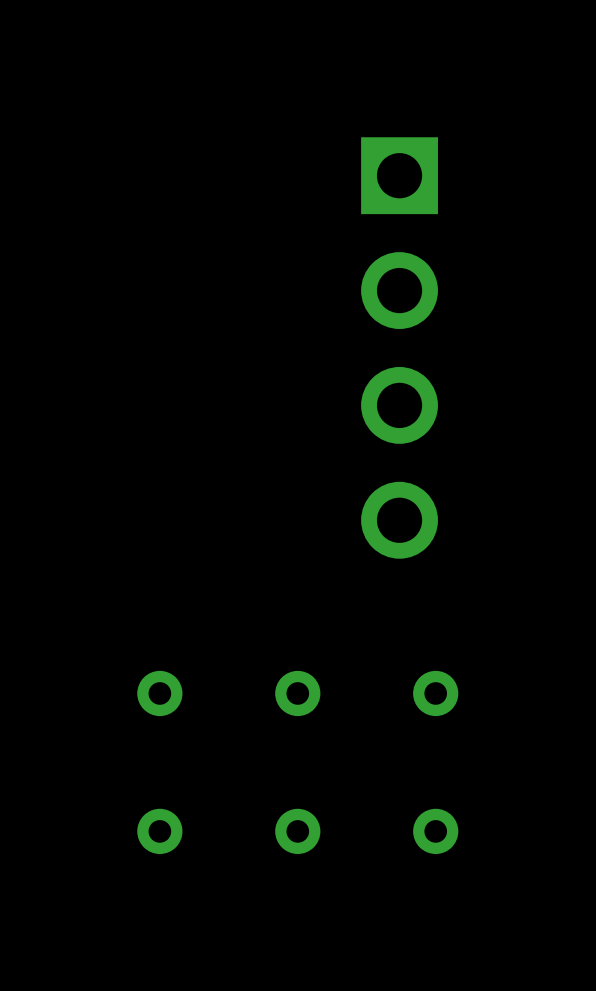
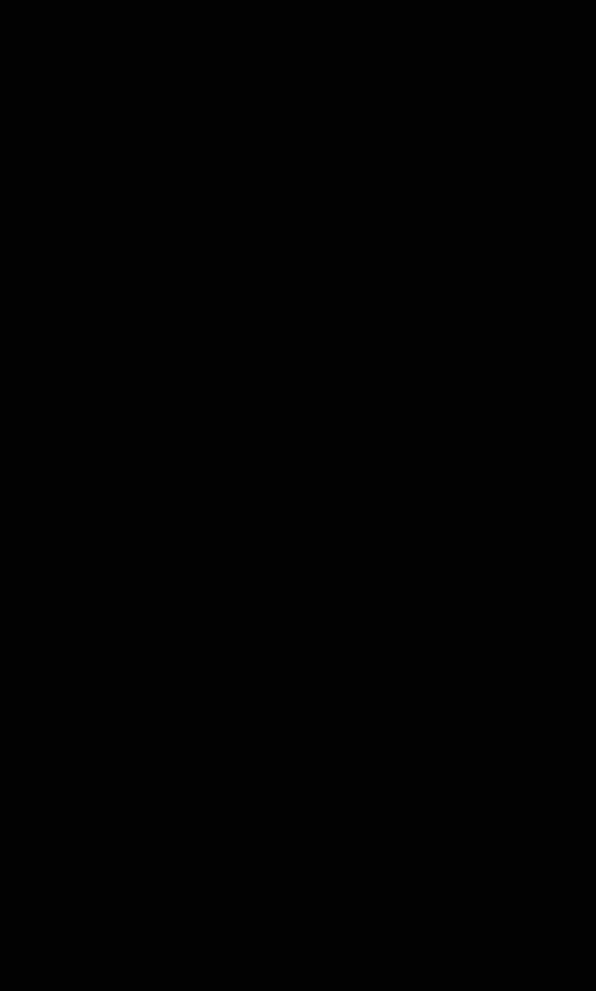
part: (399, 347) -> none
part: (159, 693) -> none
part: (297, 693) -> none
part: (435, 693) -> none
part: (159, 831) -> none
part: (297, 831) -> none
part: (435, 831) -> none

